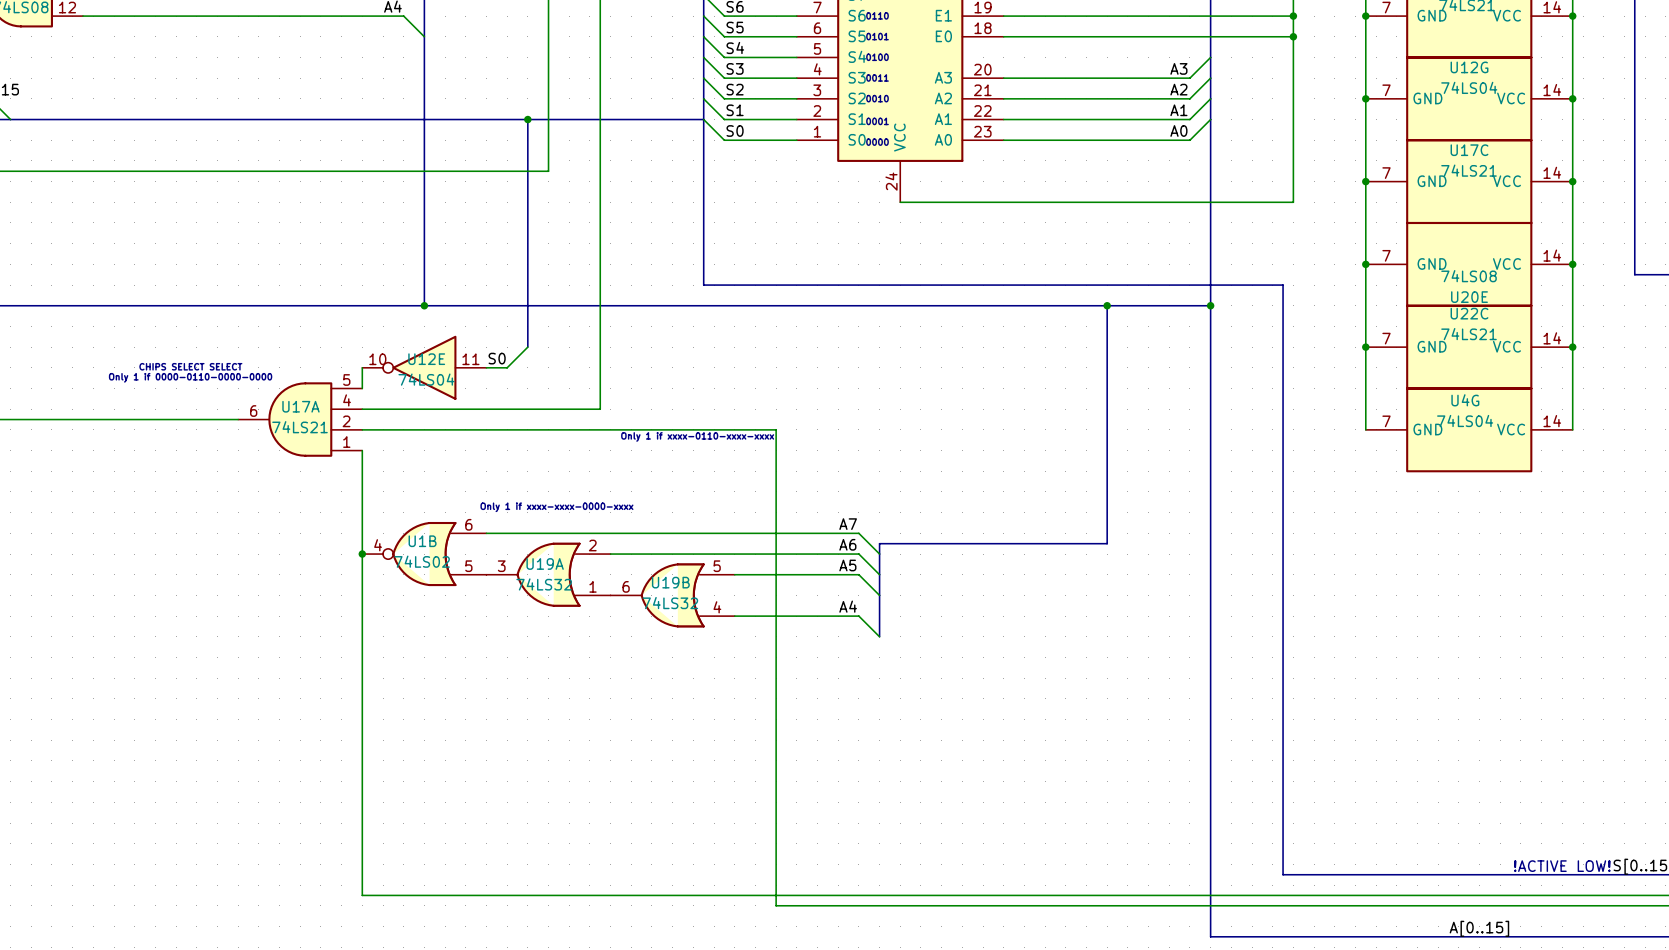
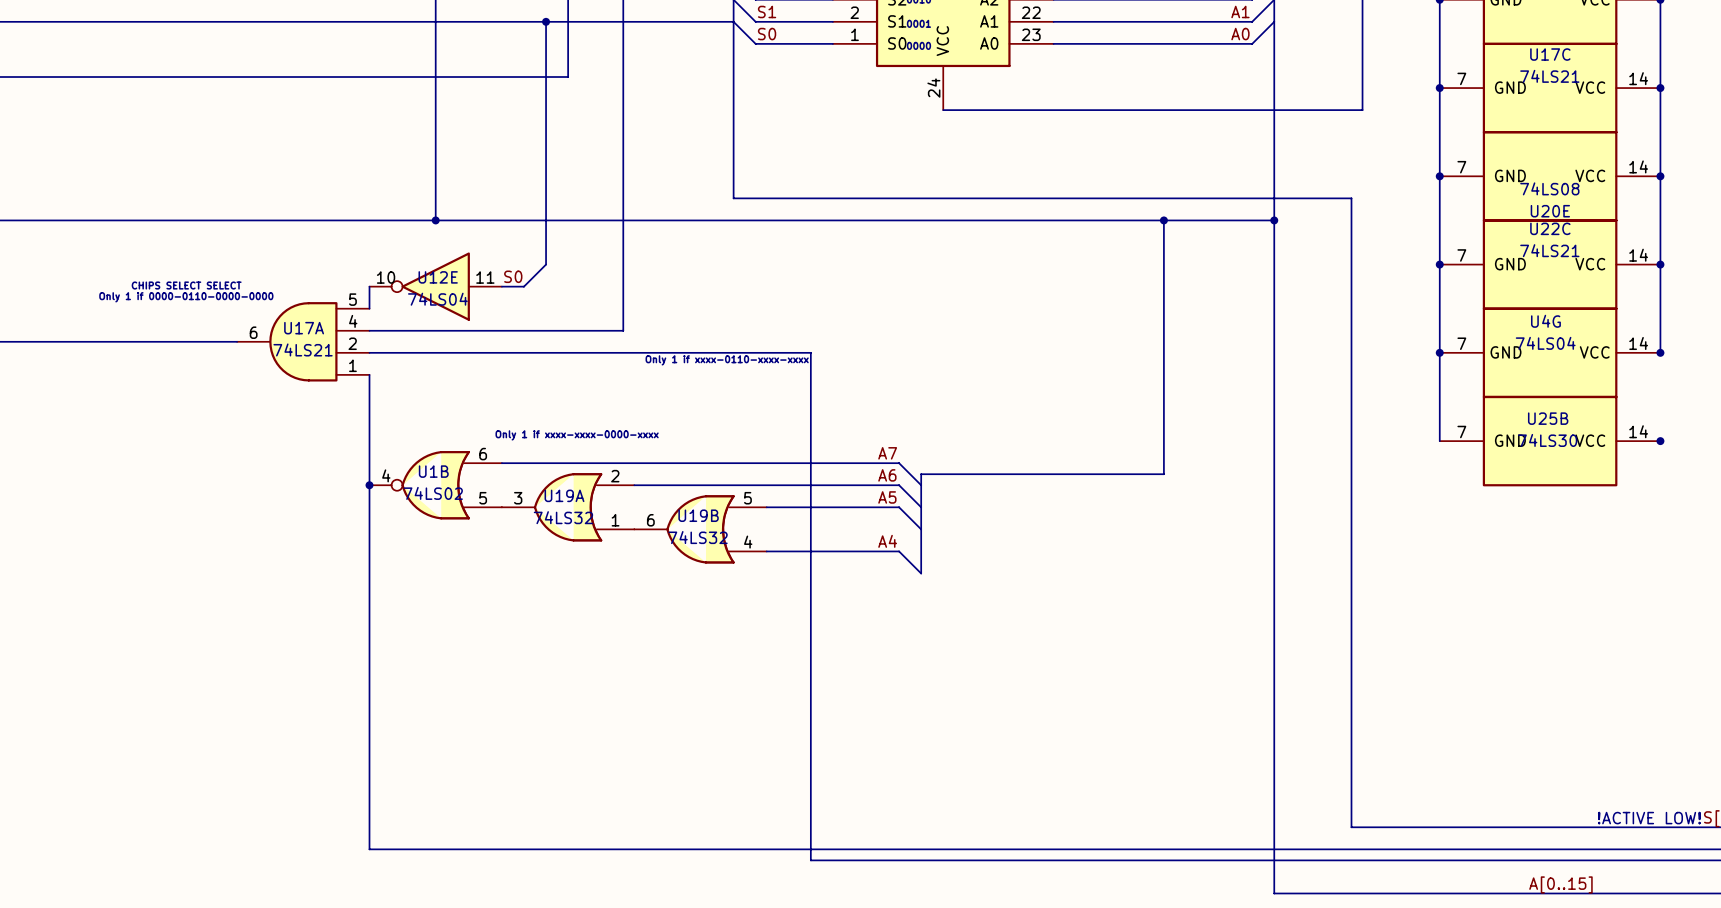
wire: none -> (1439, 352) (1439, 441)
junction: none -> (1439, 352)
junction: none -> (1660, 352)
U25B: none -> 74LS30 (1550, 441)
junction: none -> (1660, 441)

